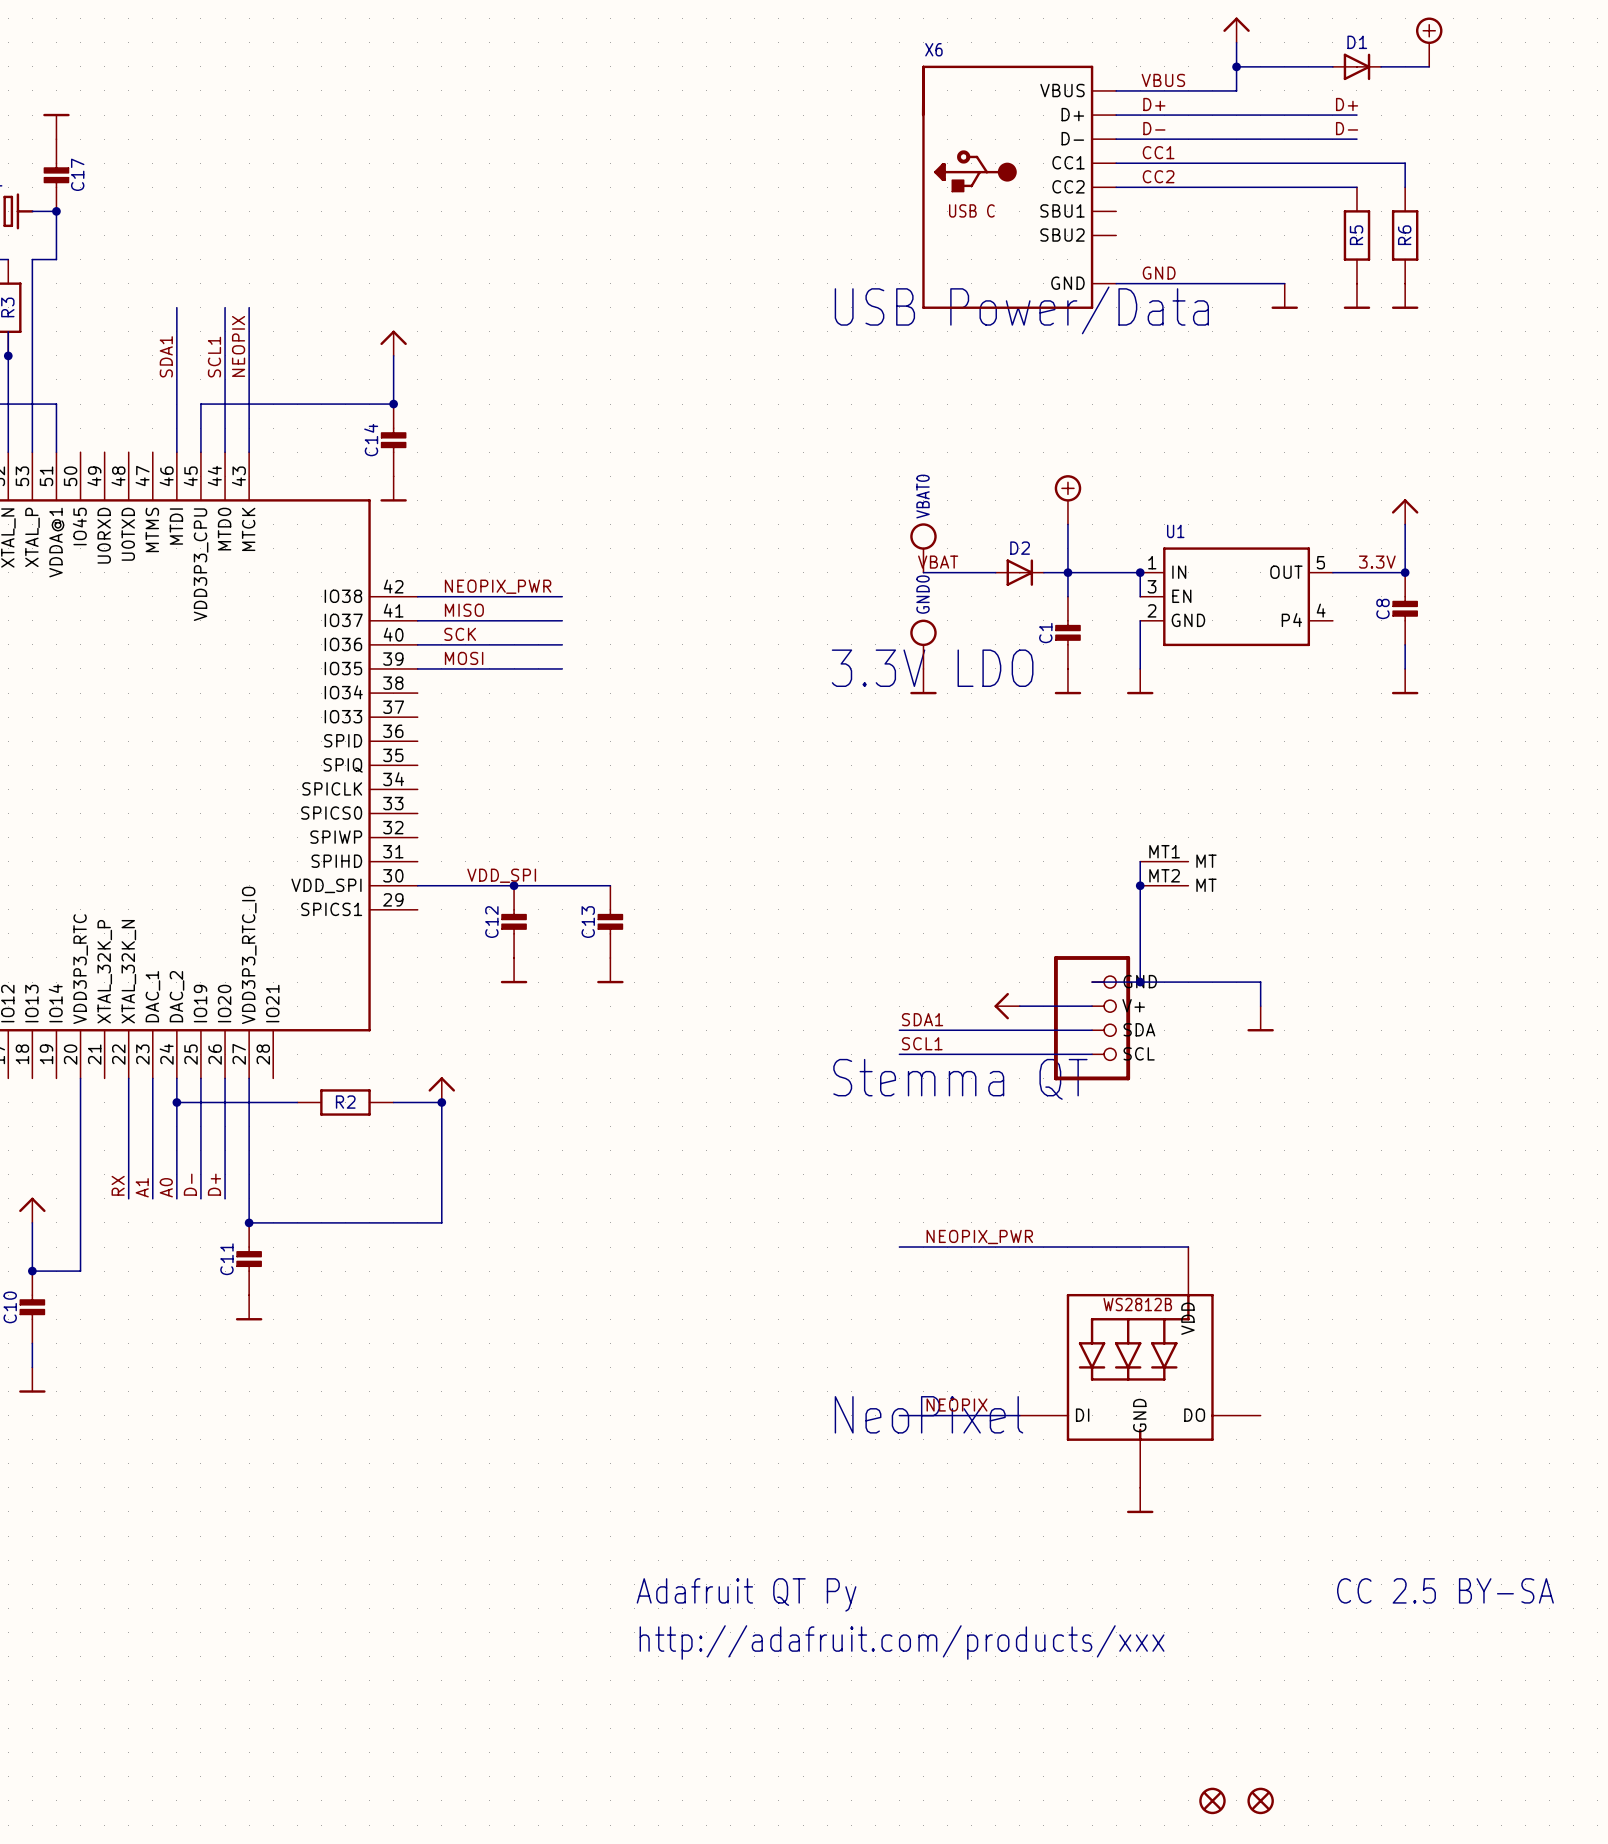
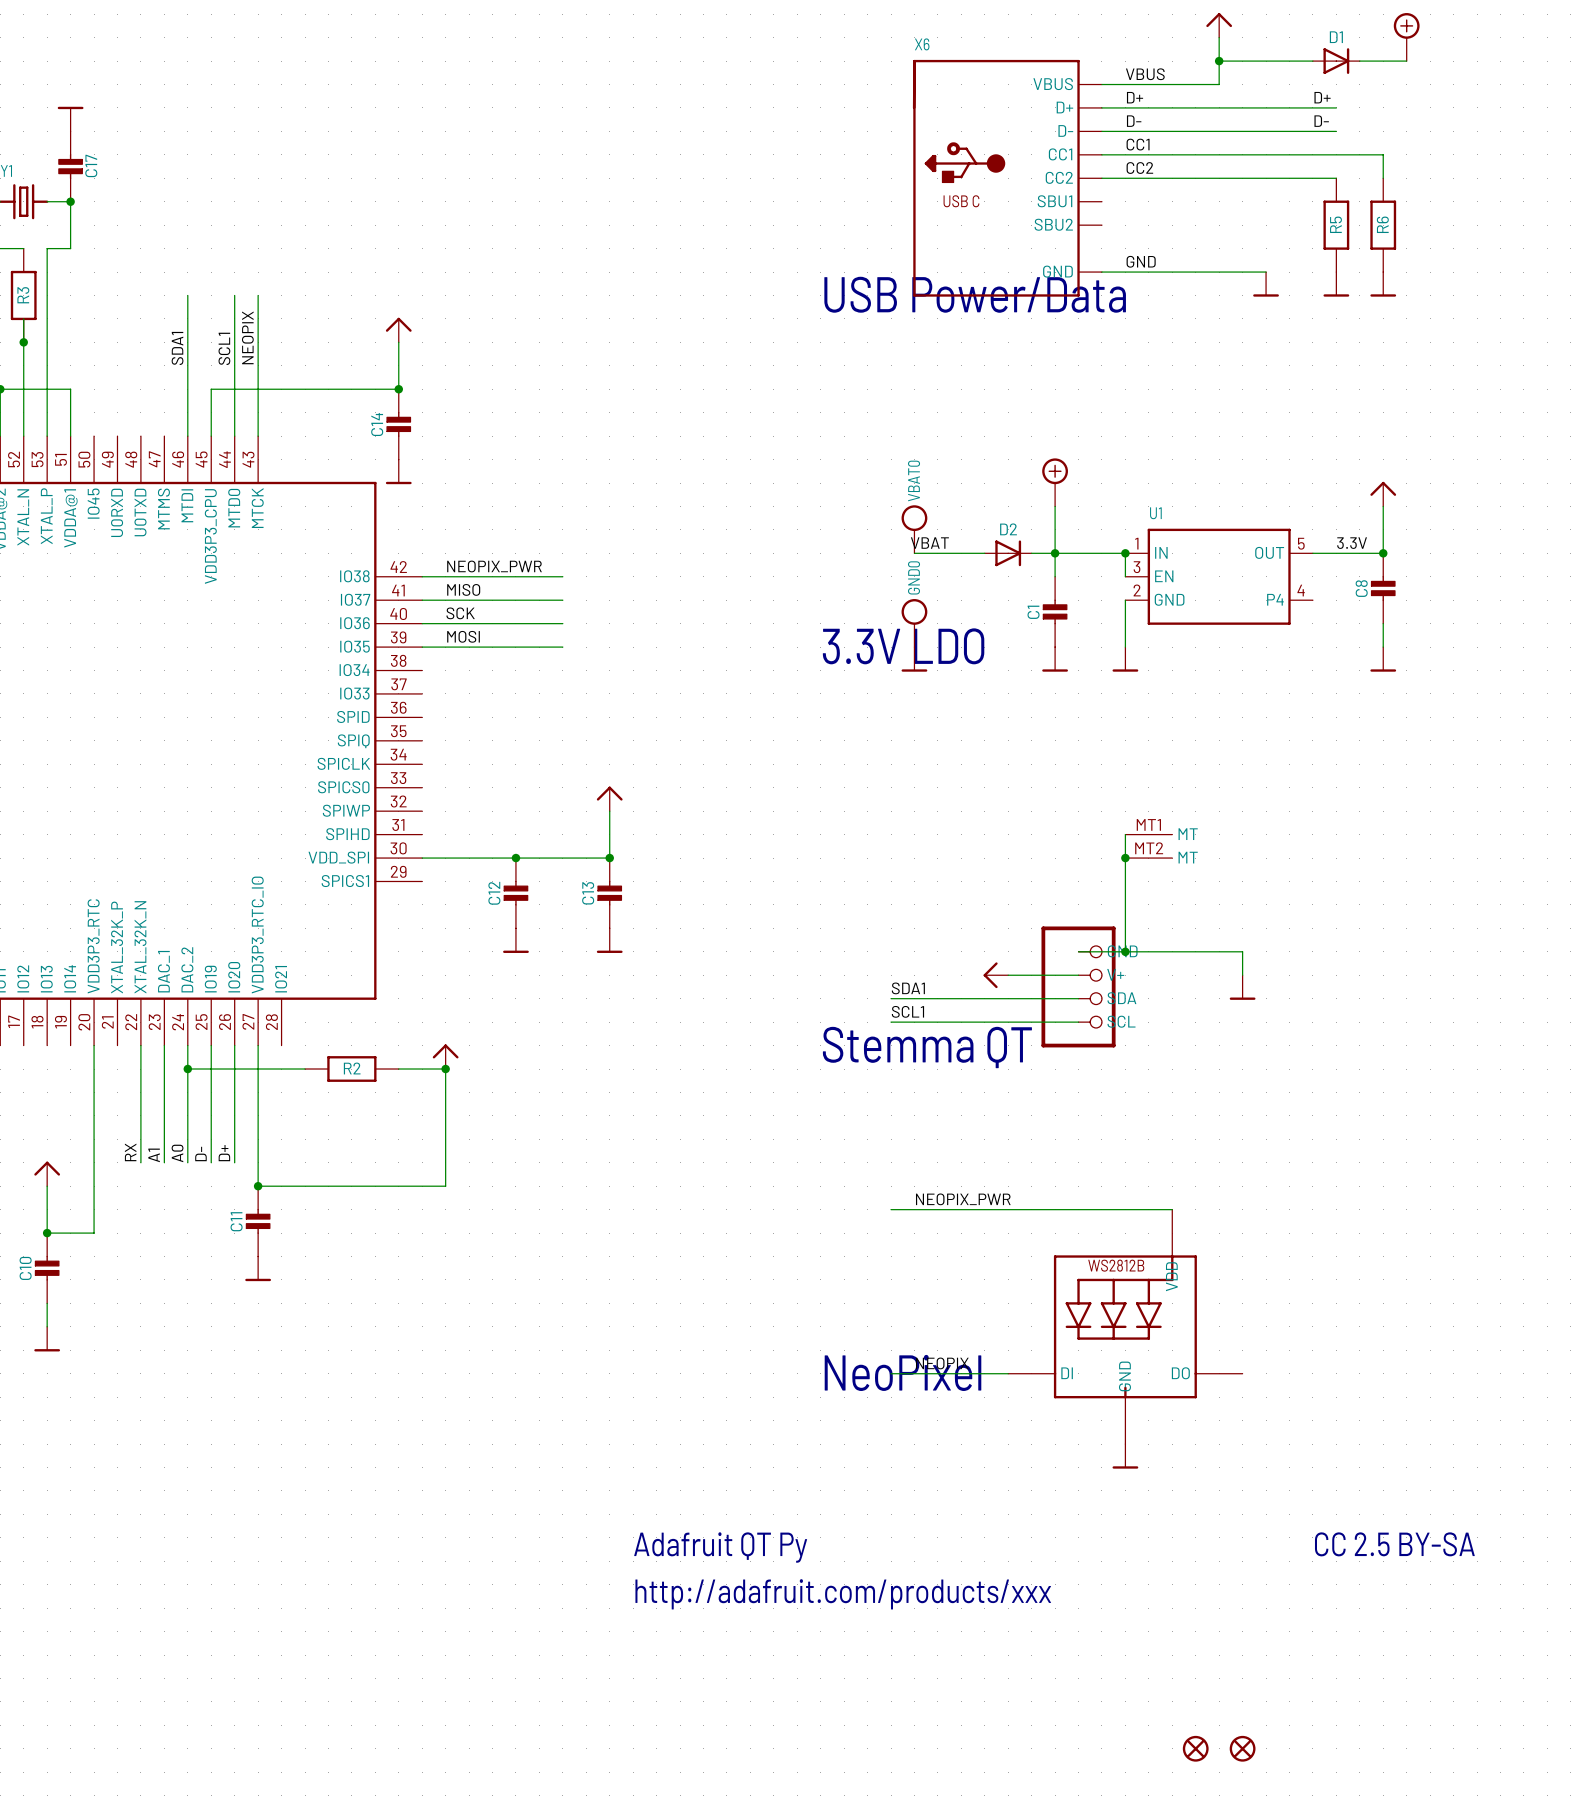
power symbol: none -> (609, 798)
wire: none -> (609, 811) (609, 858)
label: VDD_SPI (501, 875) -> none
junction: none -> (609, 858)

